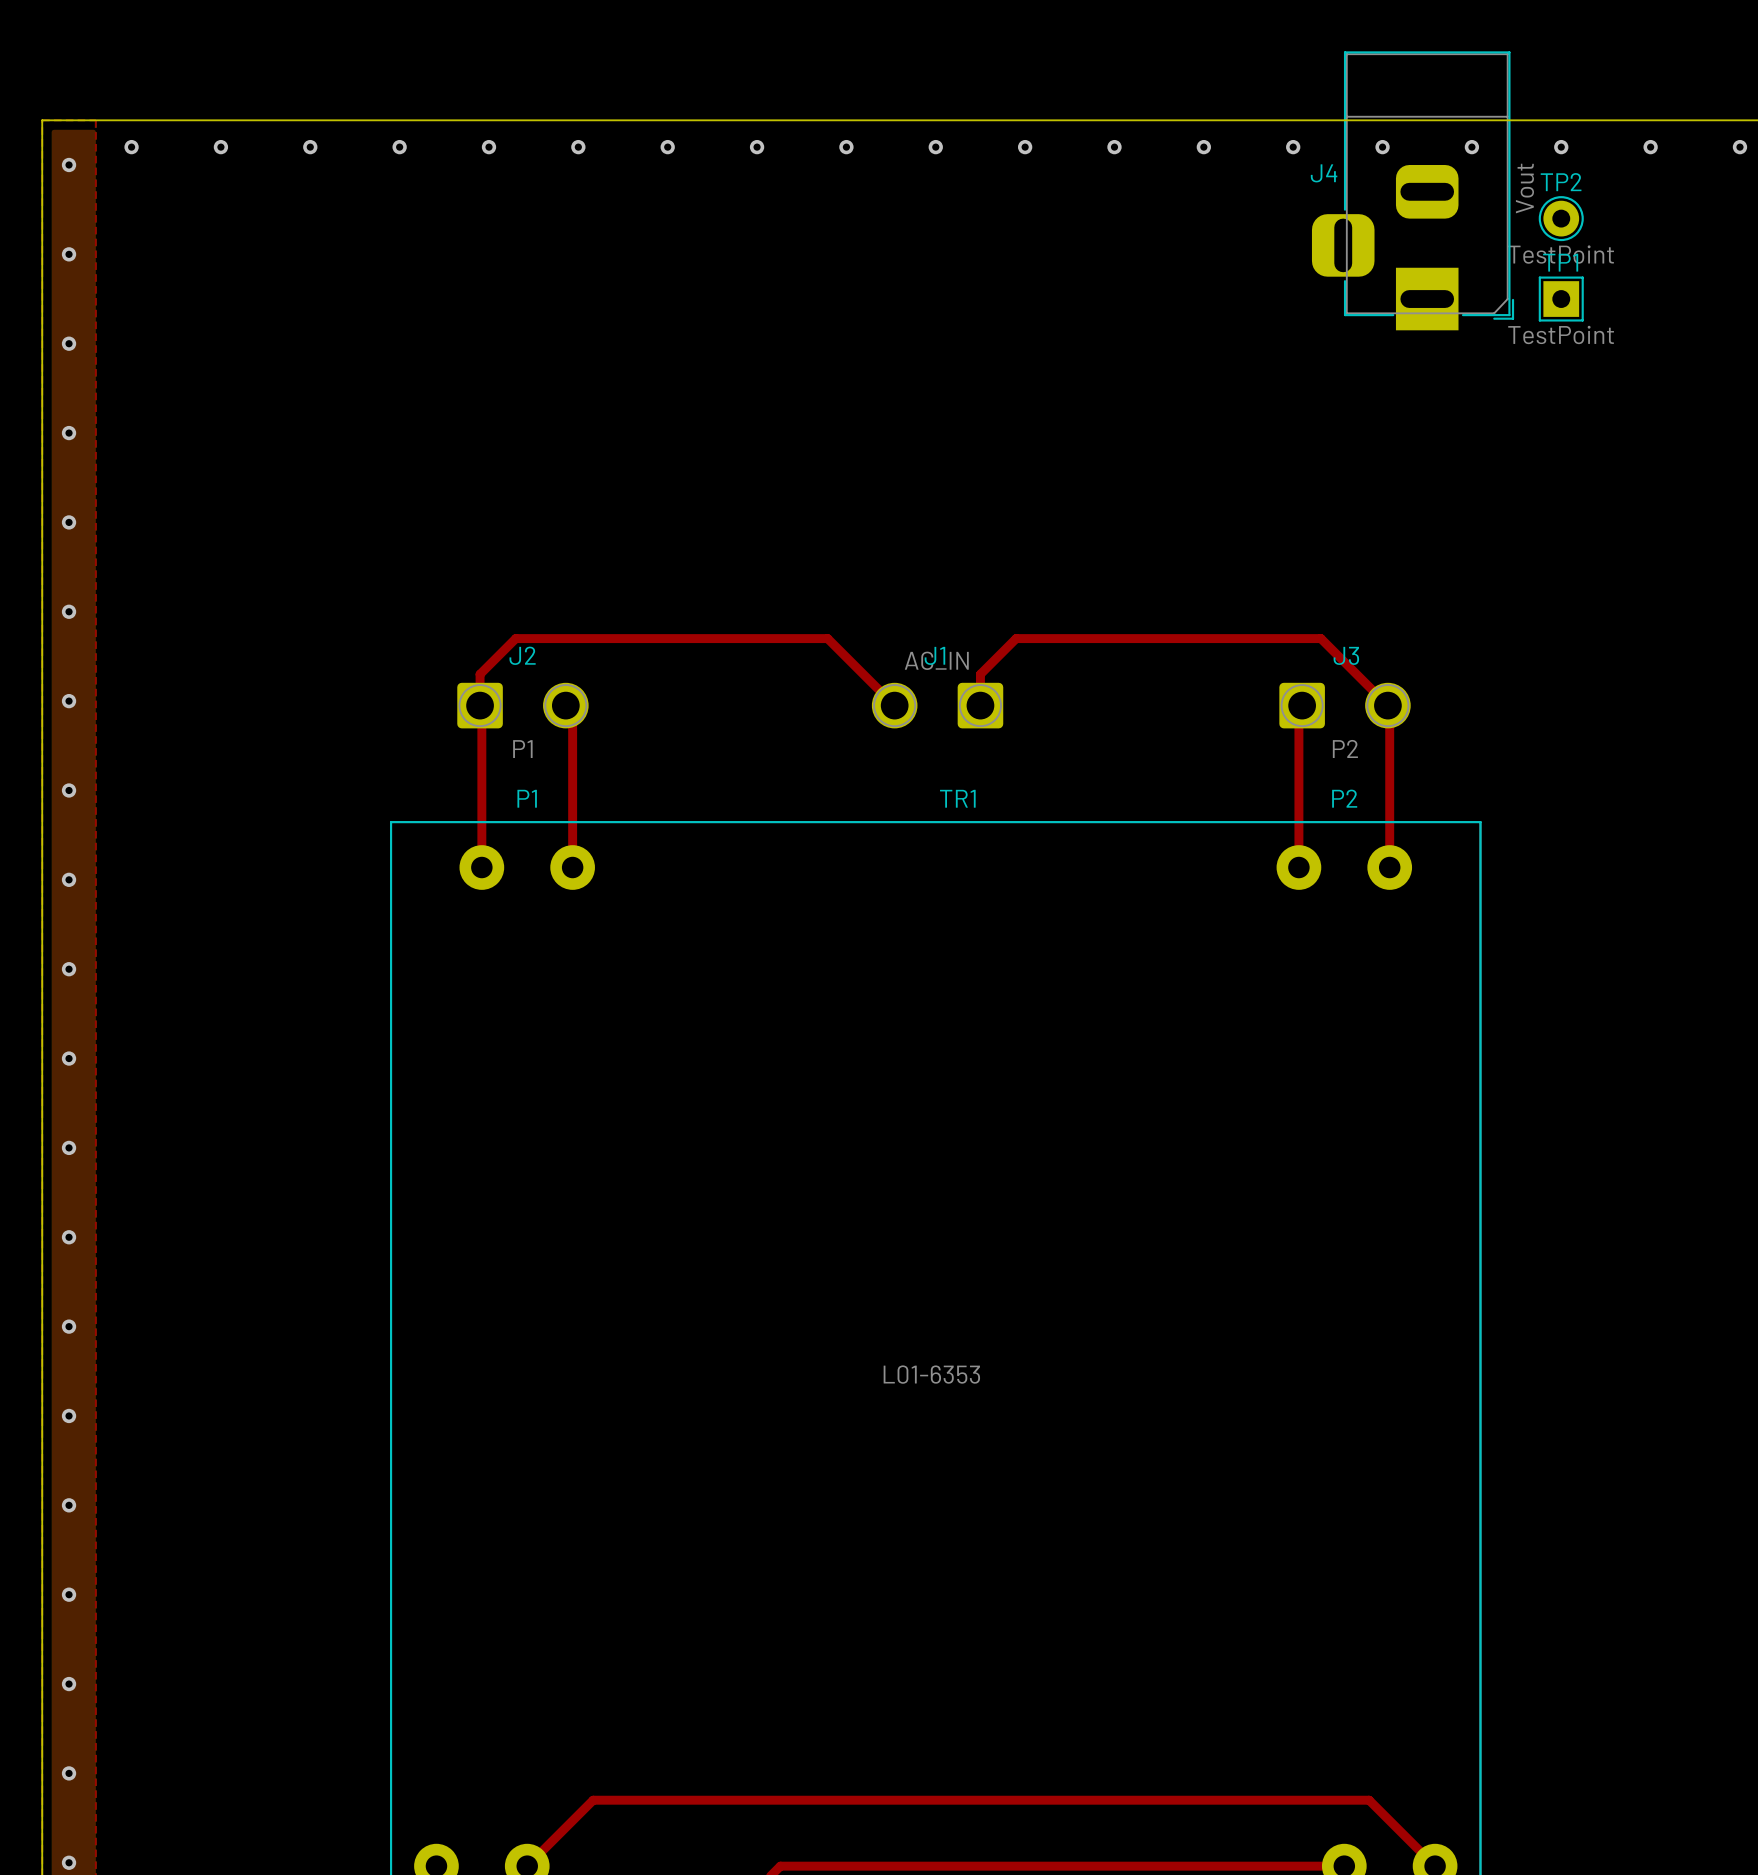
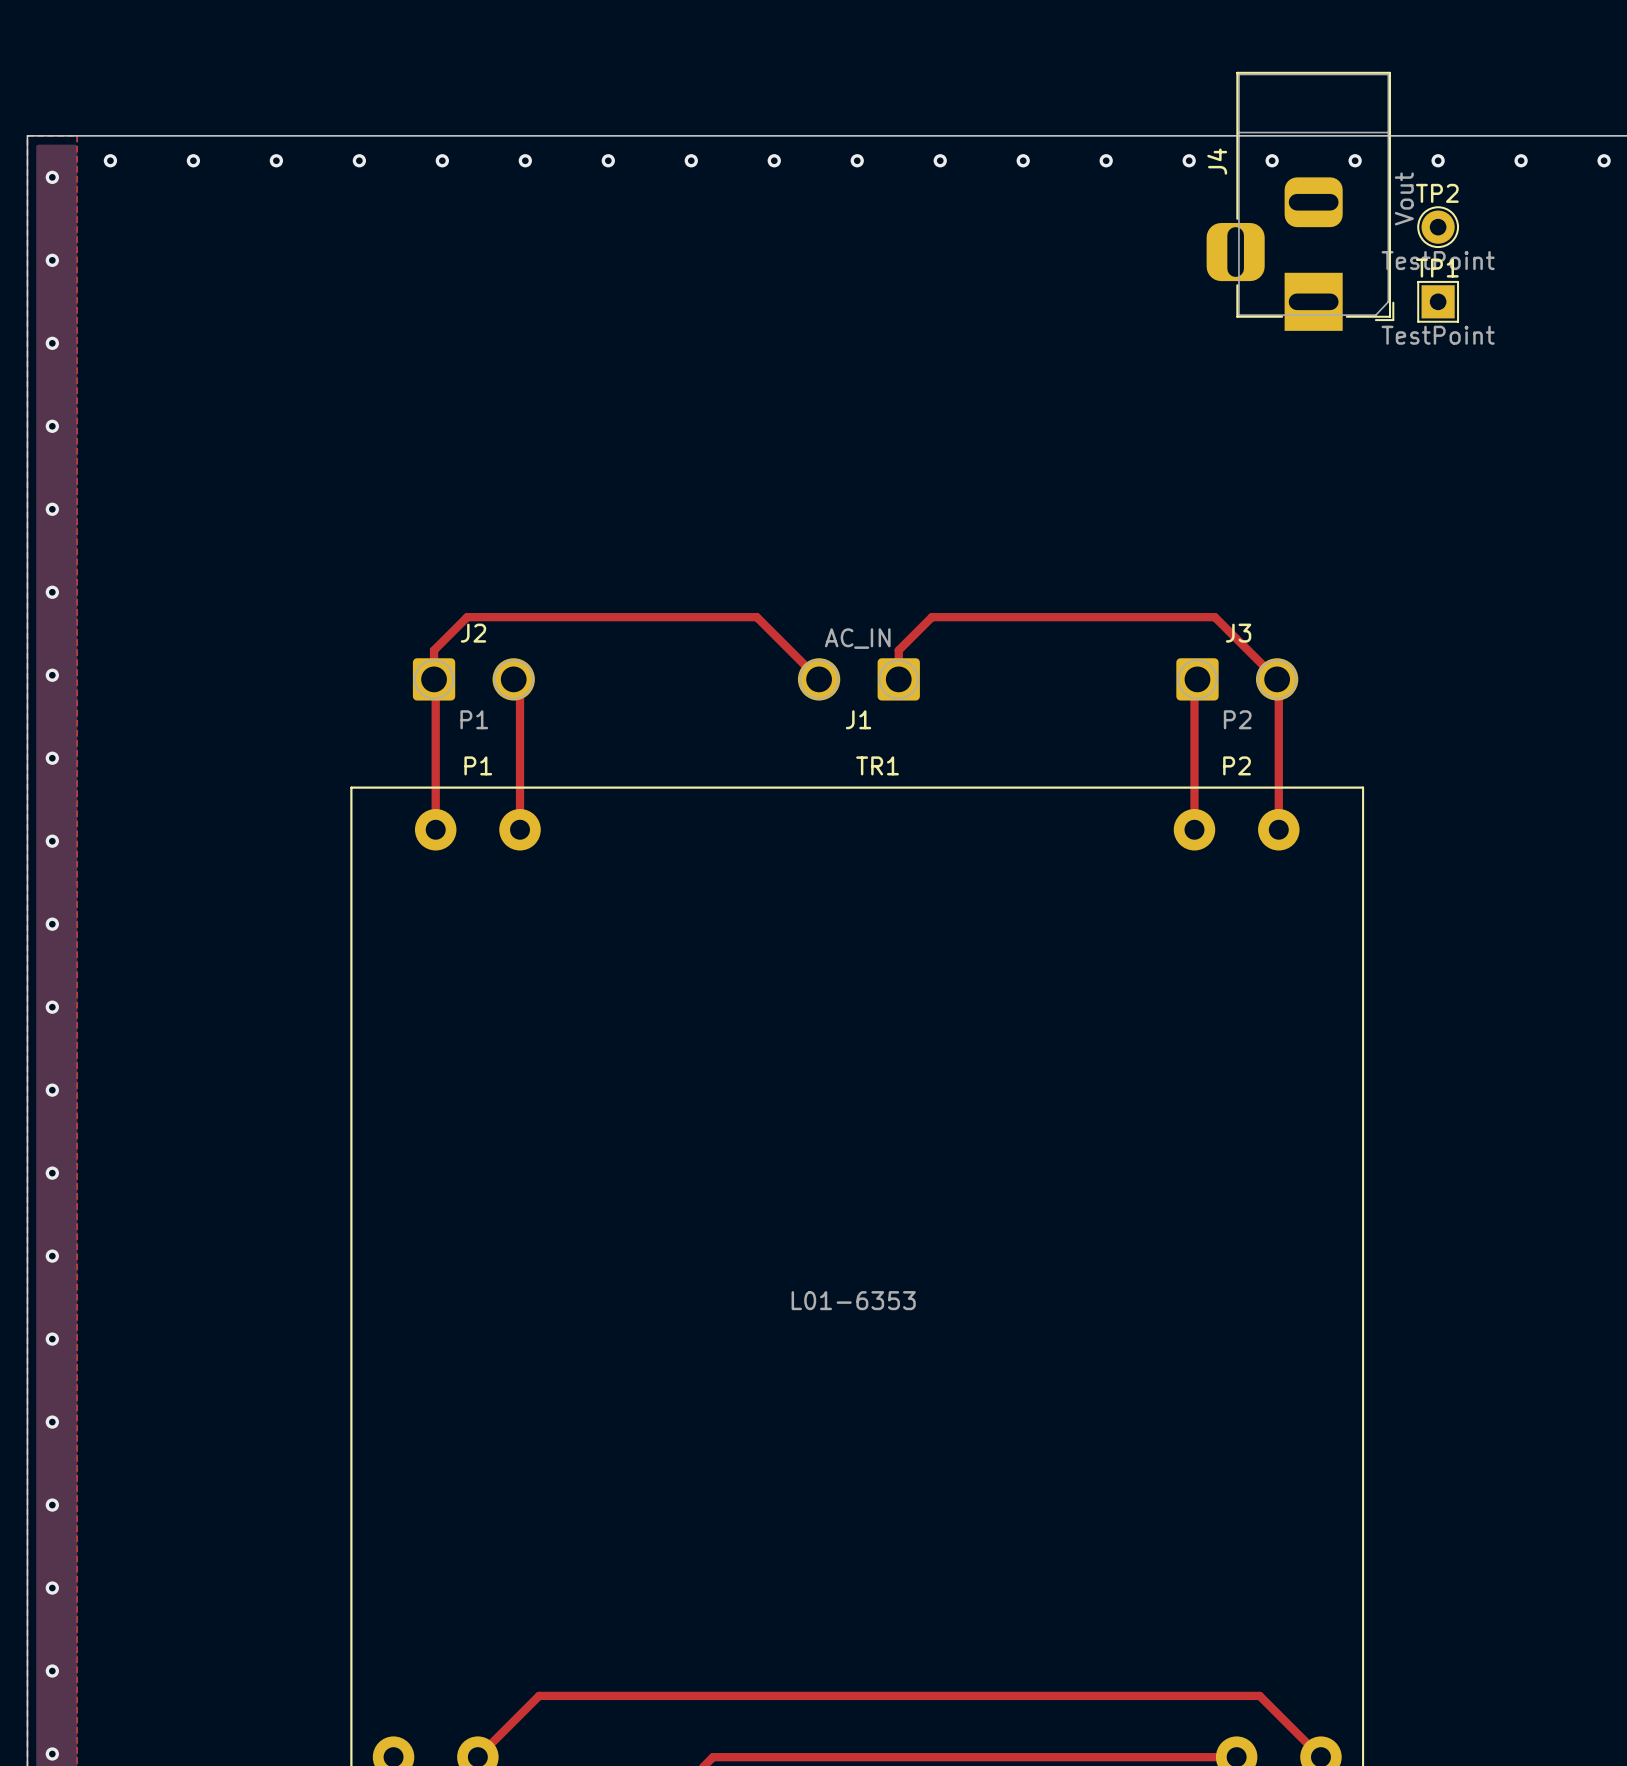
J4 name rotation: 0° (1324, 173) -> 90° counterclockwise (1217, 161)
J1 name position: J1 (934, 655) -> J1 (858, 719)

